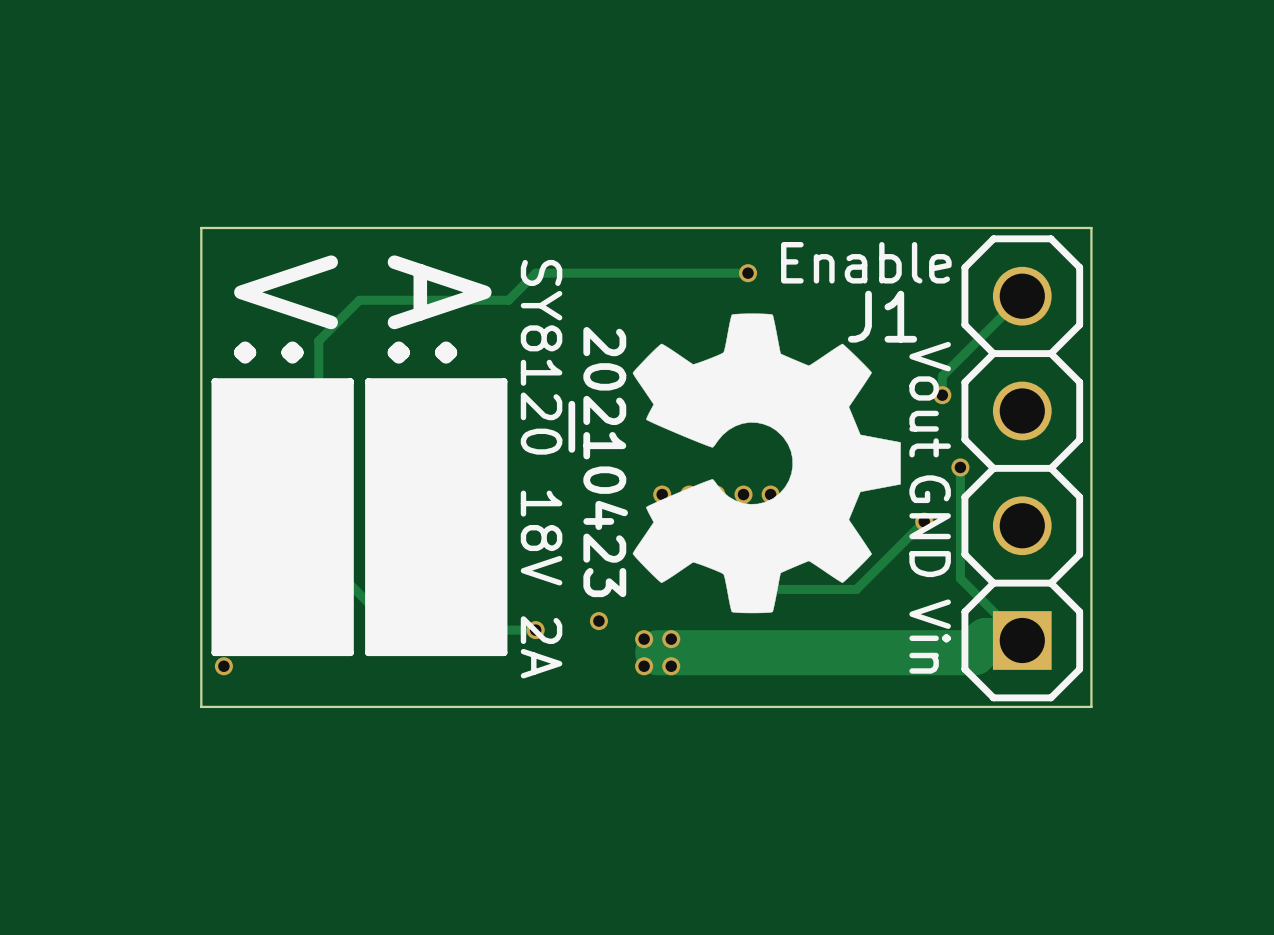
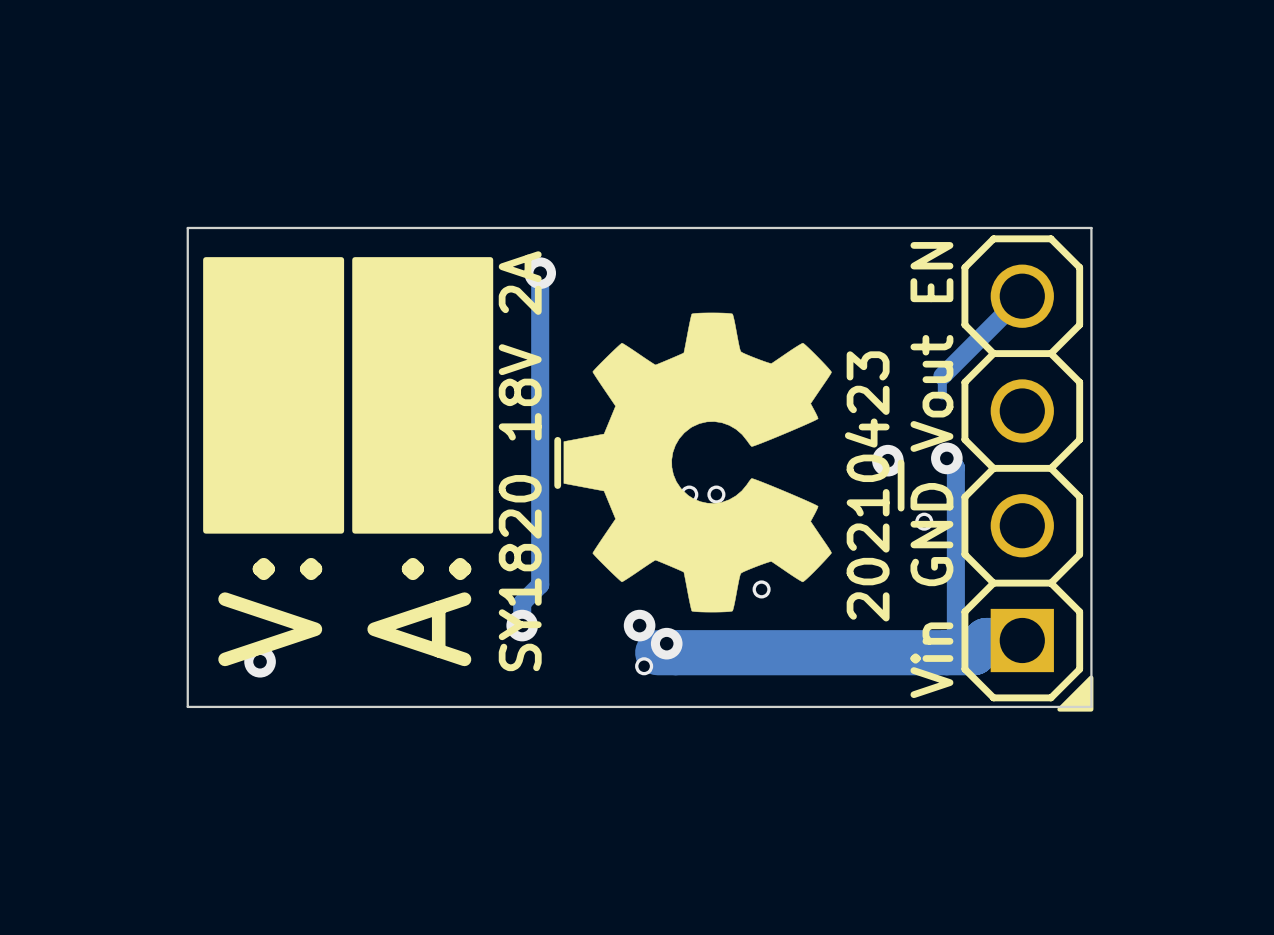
board edge: (201, 227) (201, 706) -> (201, 227) (187, 227) (187, 706) (201, 706)
drawing: none -> [203, 257, 905, 613]
text: Enable (866, 262) -> none
track: none -> (540, 273) (540, 584) (522, 602) (522, 625)
via: none -> (540, 273)
track: (748, 273) (535, 273) (508, 300) (359, 300) (318, 340) (318, 553) (395, 630) (535, 630) -> none
via: (748, 273) -> none
track width: thin (1022, 296) (942, 376) -> thick (1022, 296) (942, 376)
drawing: [211, 313, 901, 657] -> none
via: (942, 395) -> none
text: Vout (930, 399) -> none
track: none -> (946, 458) (955, 467) (955, 643) (946, 652)
via size: [951, 458, 970, 477] -> [931, 442, 963, 475]
via: none -> (887, 460)
track: (960, 467) (960, 578) (1022, 640) -> none
J1: (1022, 468) -> none
text: SY8120 18V 2A (541, 469) -> none
text: none -> Vin GND Vout EN (931, 470)
part: none -> (1027, 473)
via: (743, 494) -> none
via: (770, 494) -> none
track: (924, 521) (856, 589) (761, 589) -> none
text: GND (930, 526) -> none
via size: [526, 621, 545, 640] -> [506, 609, 539, 642]
via: (598, 621) -> none
via: none -> (639, 625)
via size: [662, 630, 681, 649] -> [650, 627, 683, 660]
text: Vin (930, 636) -> none
via: (644, 639) -> none
via: none -> (260, 661)
via: (223, 666) -> none
via: (671, 666) -> none

